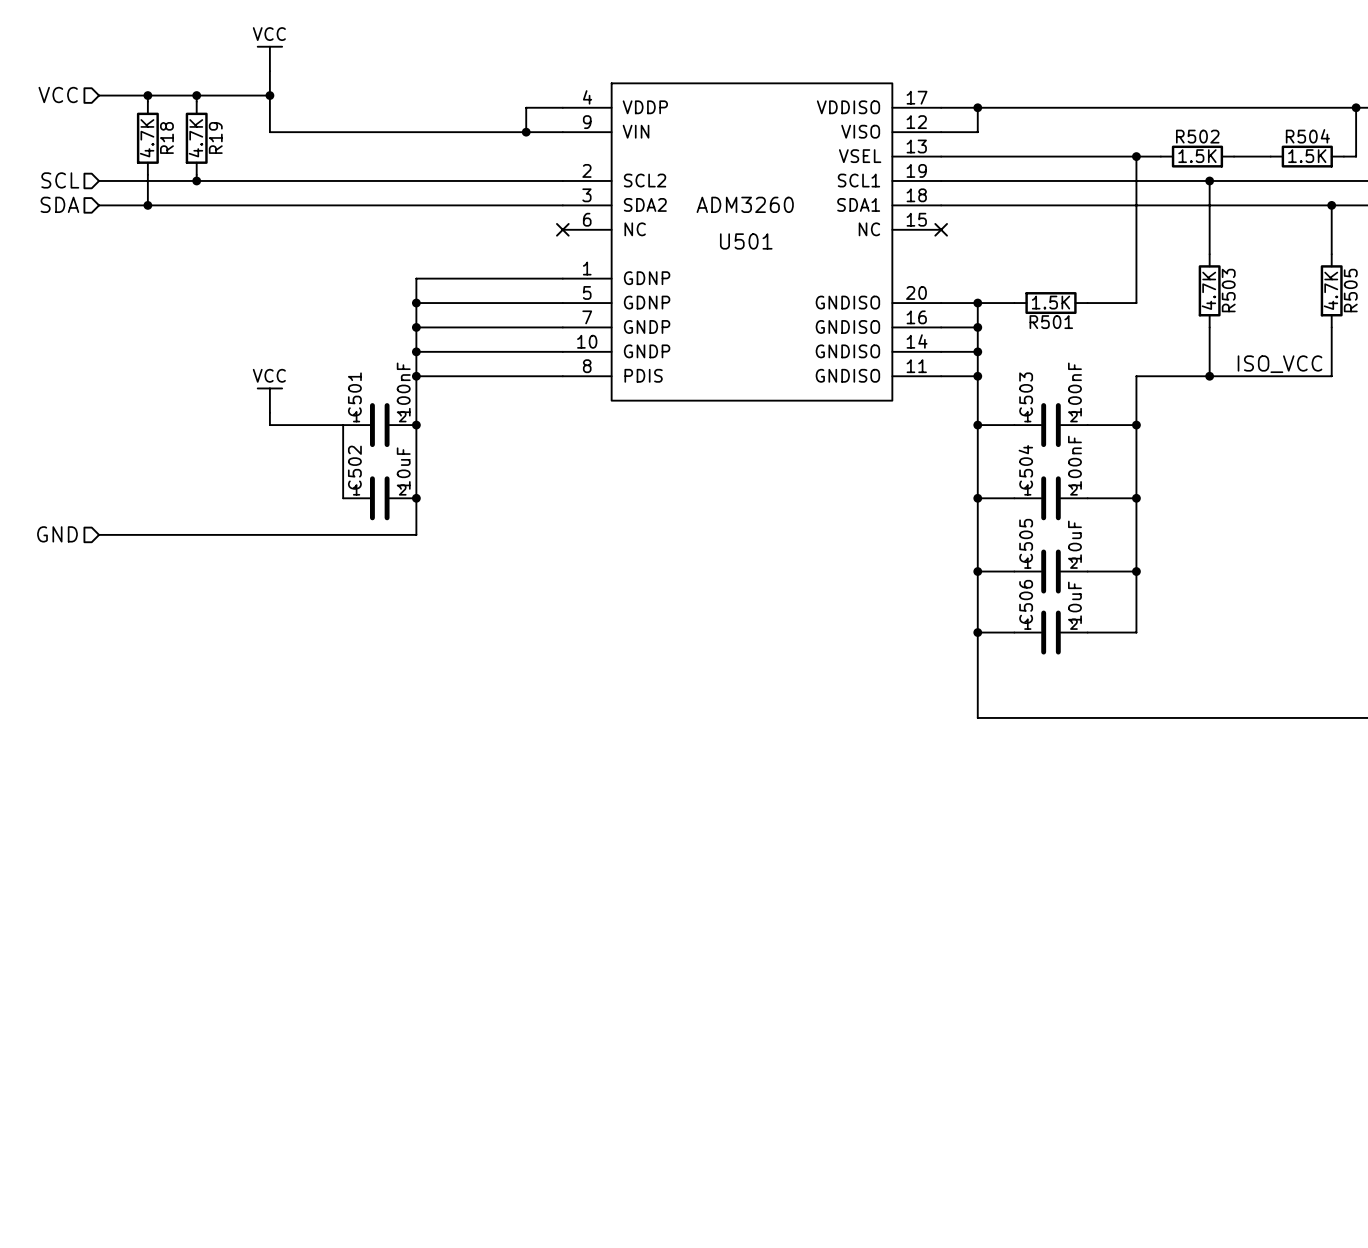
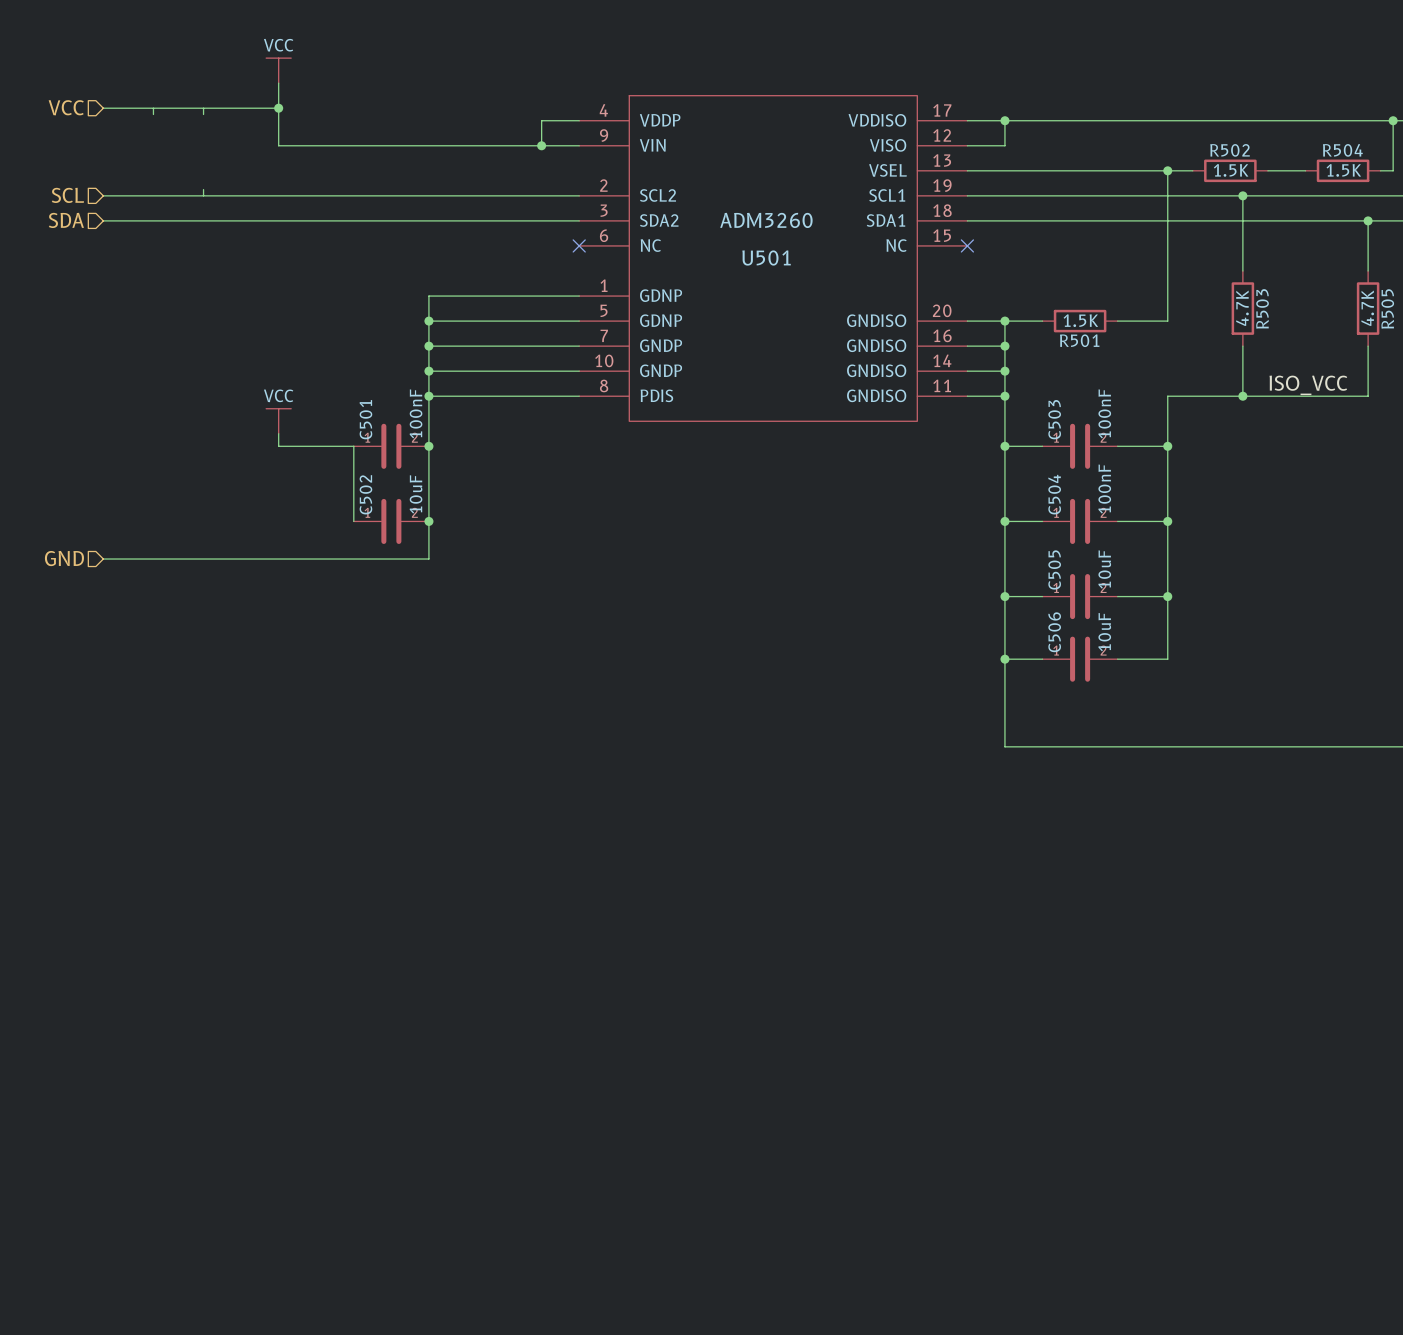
junction: (147, 95) -> none
junction: (196, 95) -> none
R18: 4.7K (147, 138) -> none
R19: 4.7K (196, 138) -> none
wire: (147, 174) (147, 205) -> none
junction: (196, 180) -> none
junction: (147, 205) -> none

